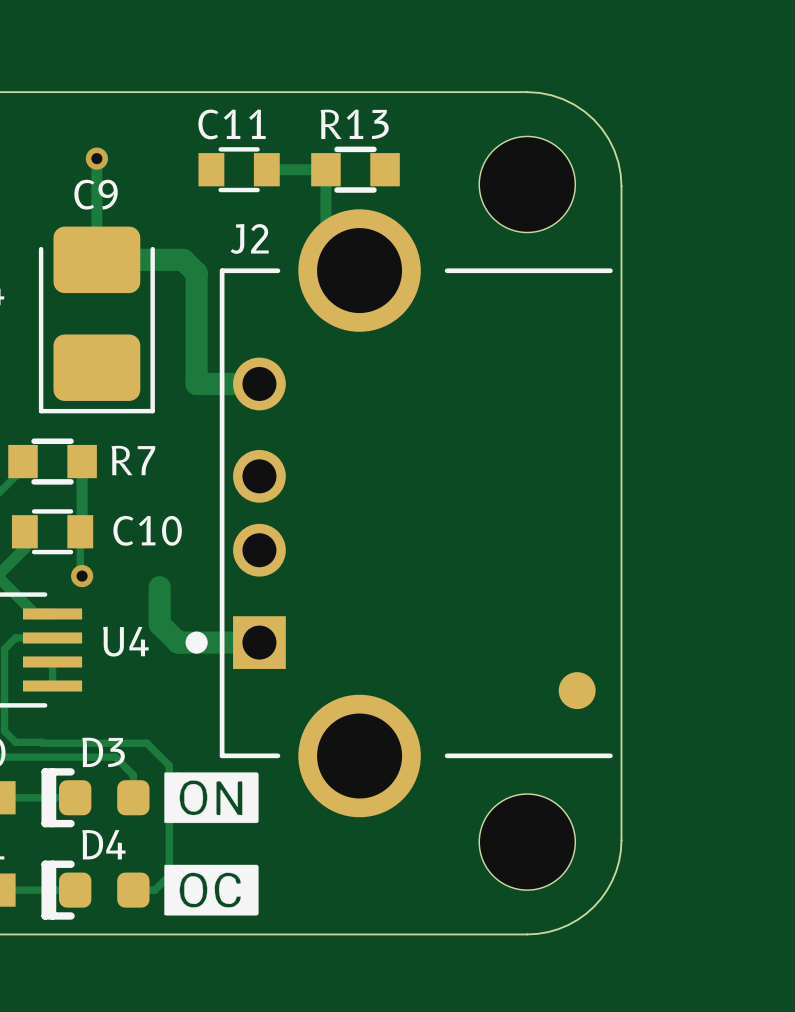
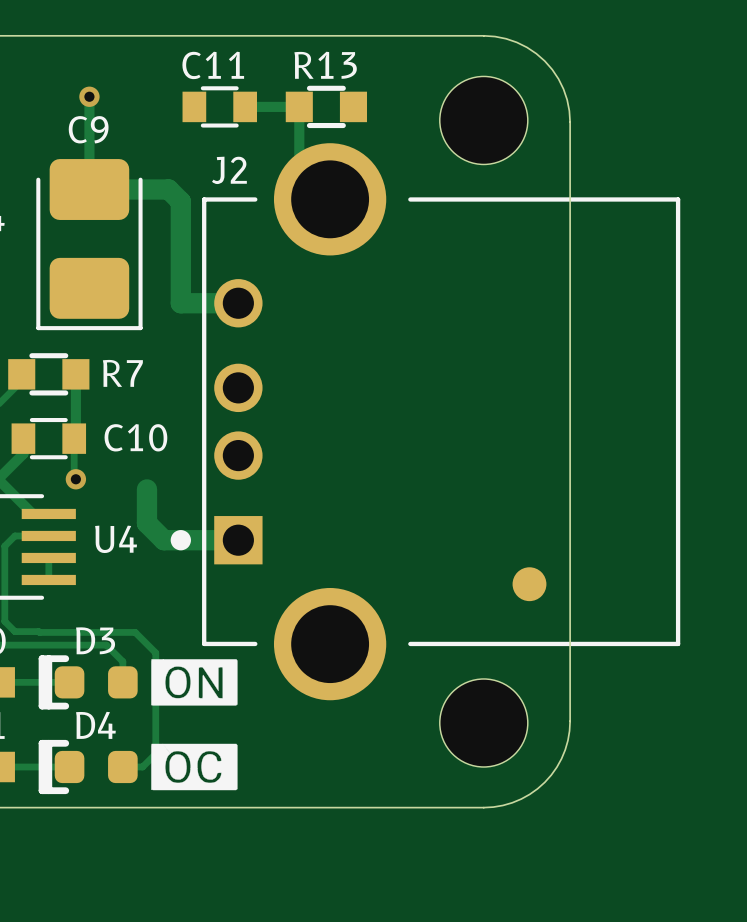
J2 footprint: [185, 209, 613, 818] -> [170, 143, 681, 701]

